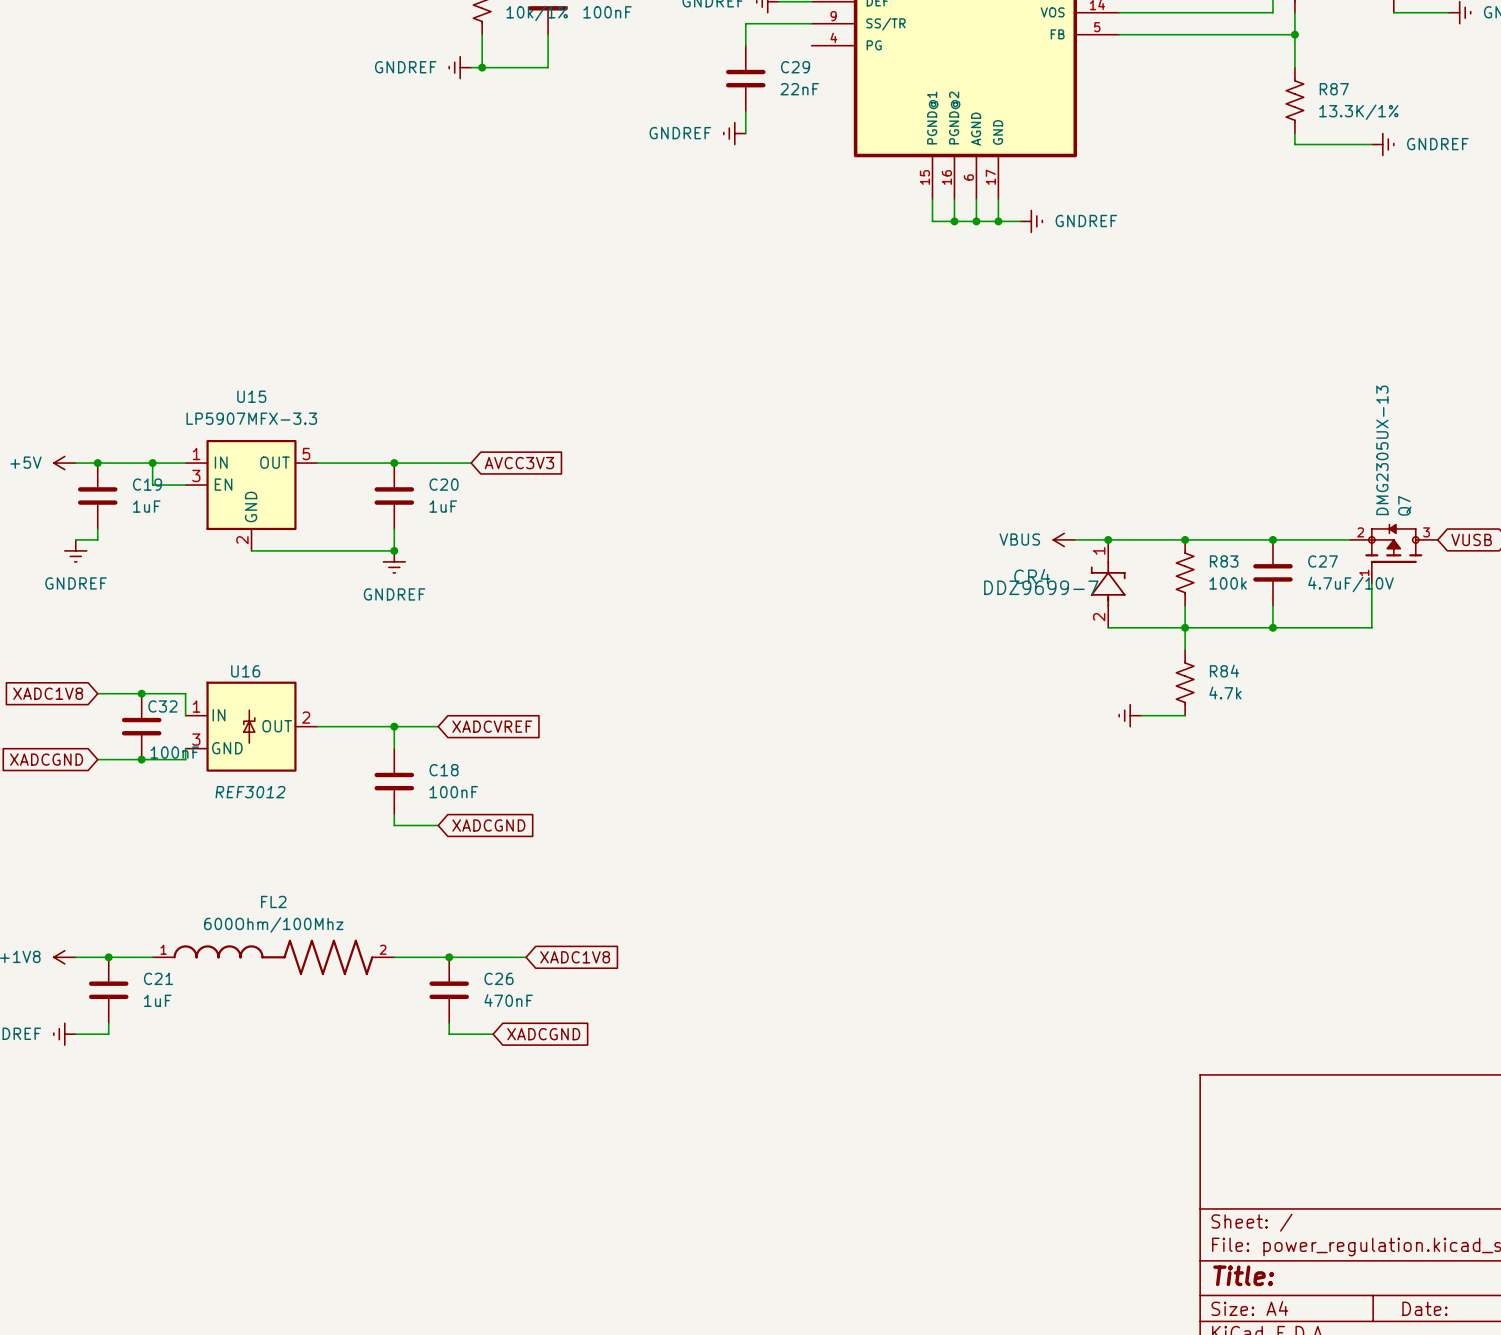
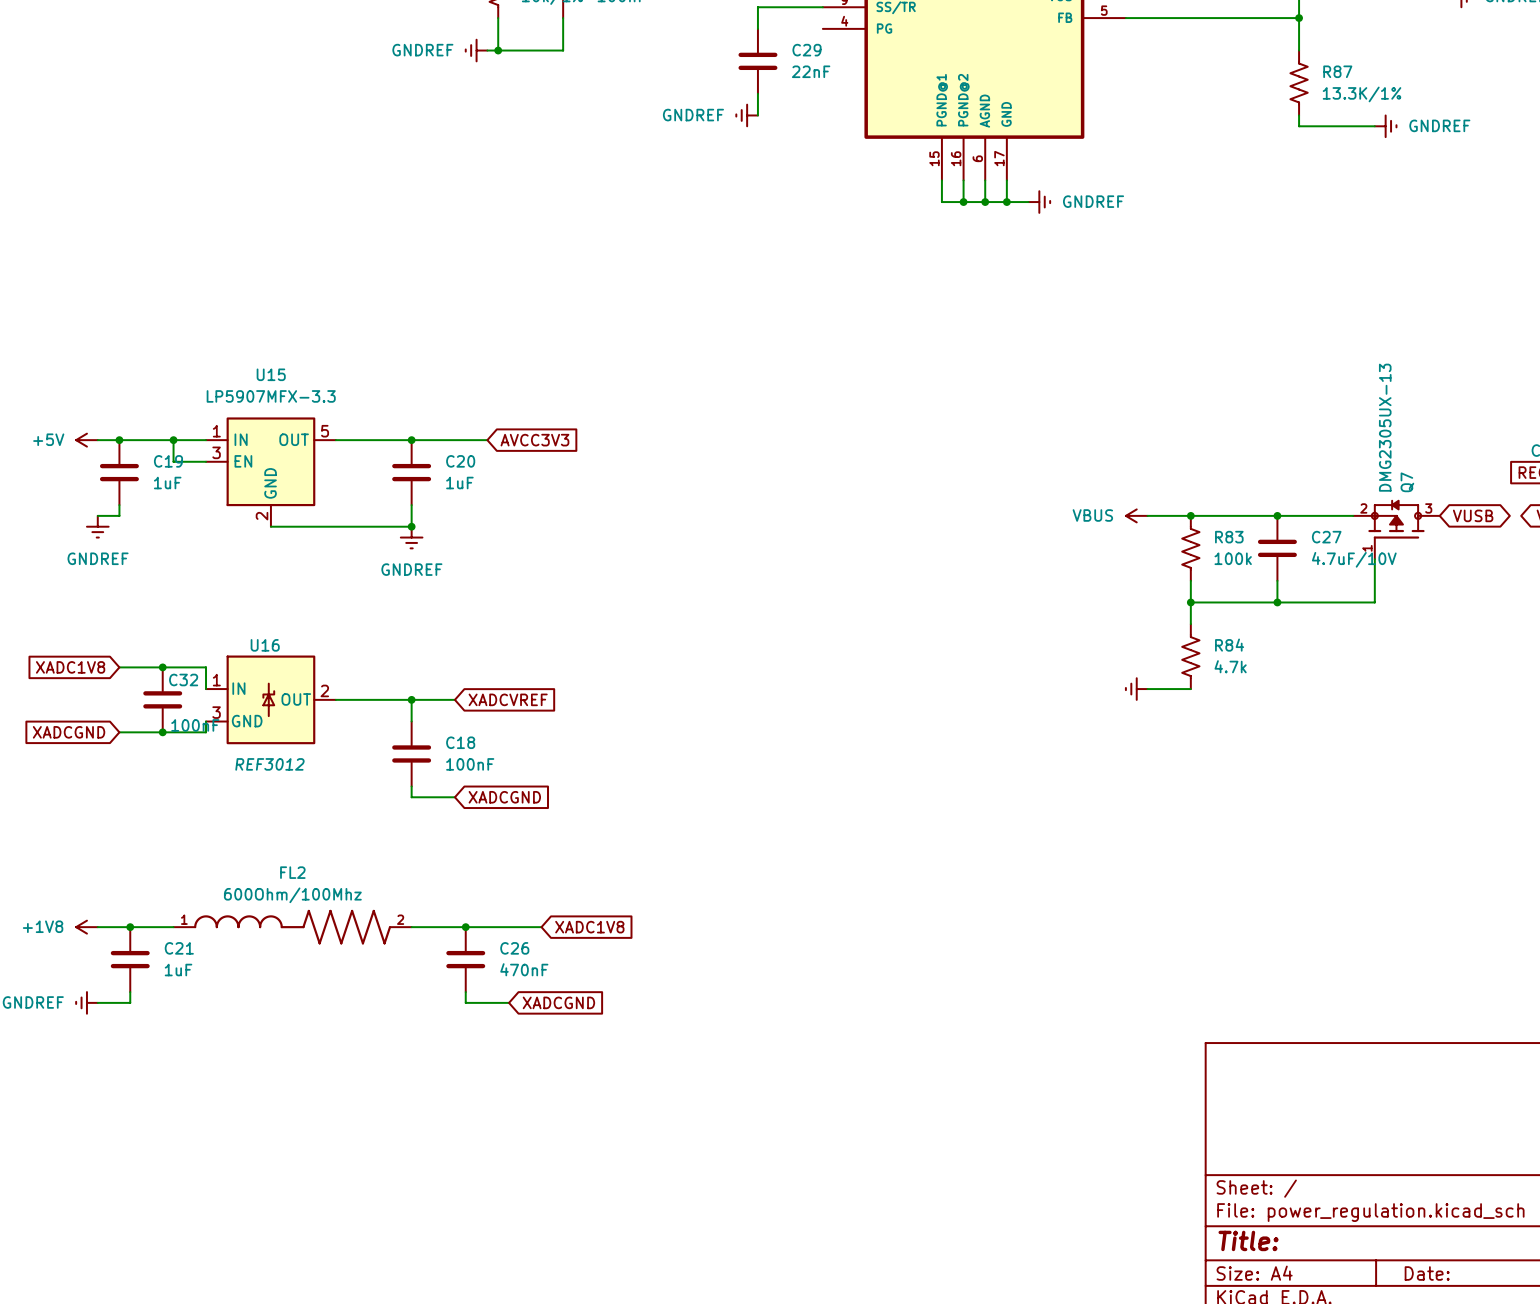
power symbol position: VBUS (1064, 539) -> VBUS (1136, 515)
junction: (1108, 539) -> none
CR4: DDZ9699-7 (1108, 583) -> none
wire: (1108, 627) (1185, 627) -> none

